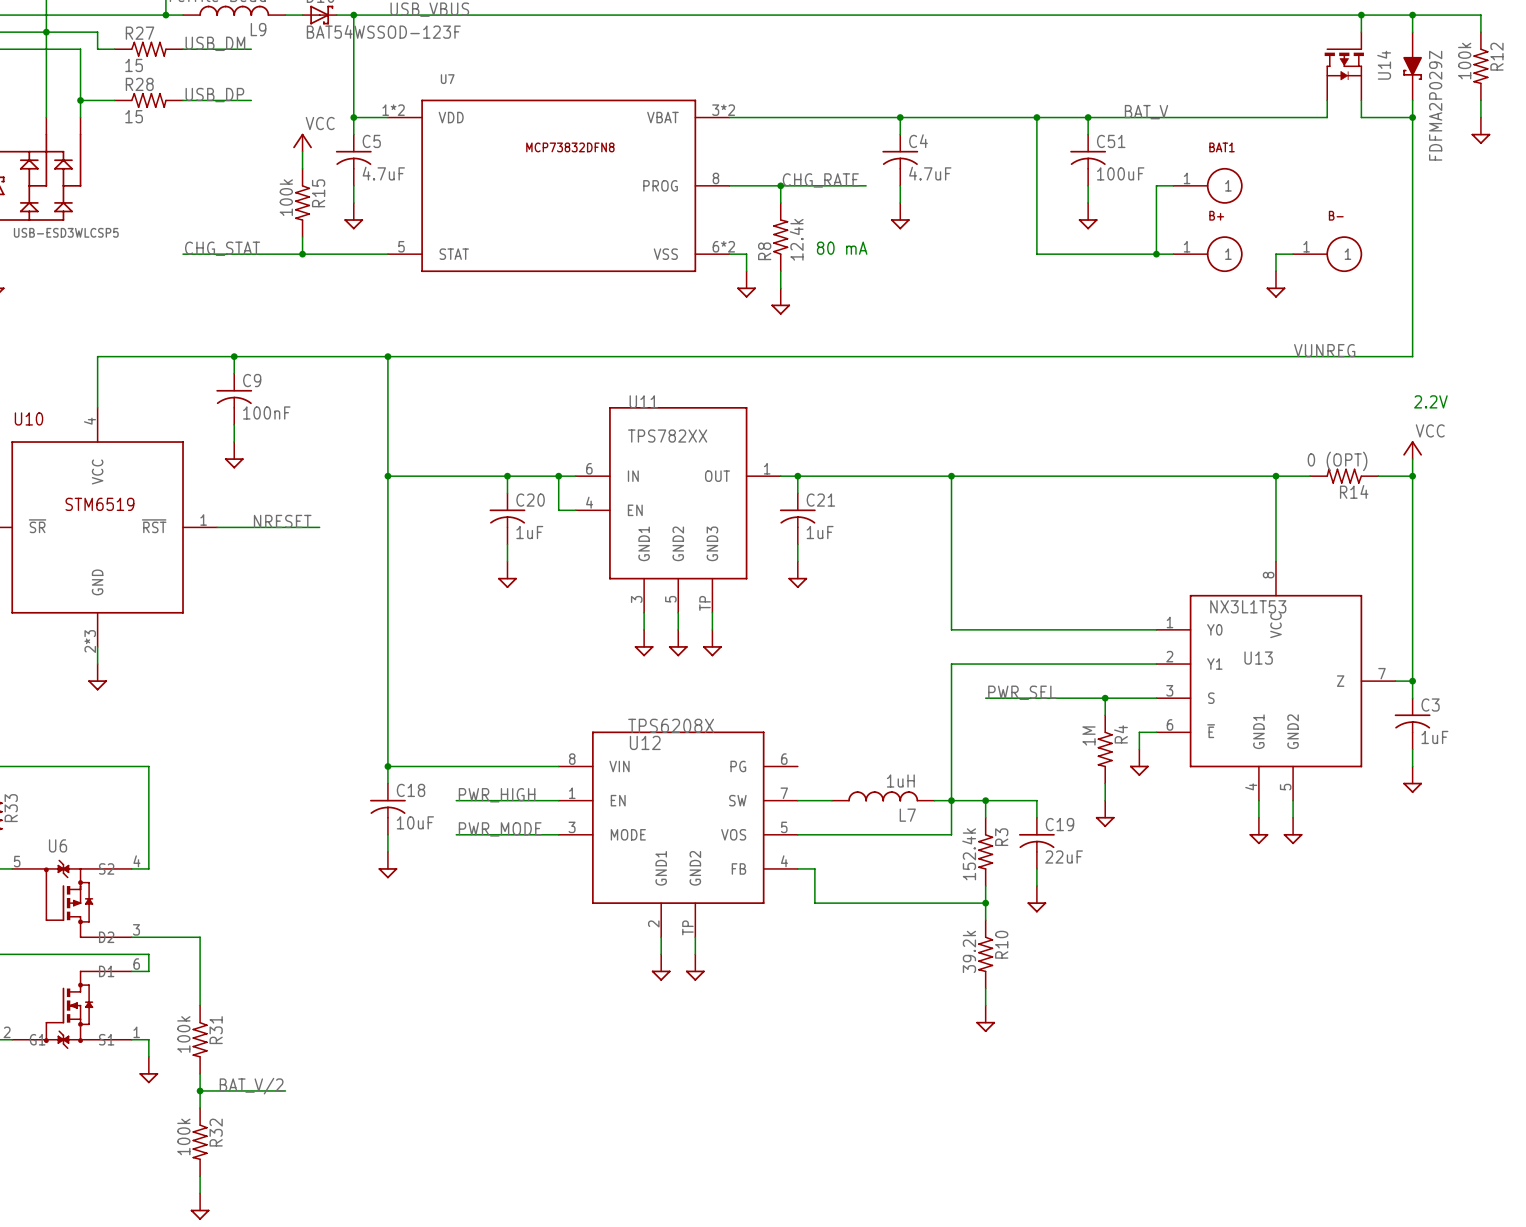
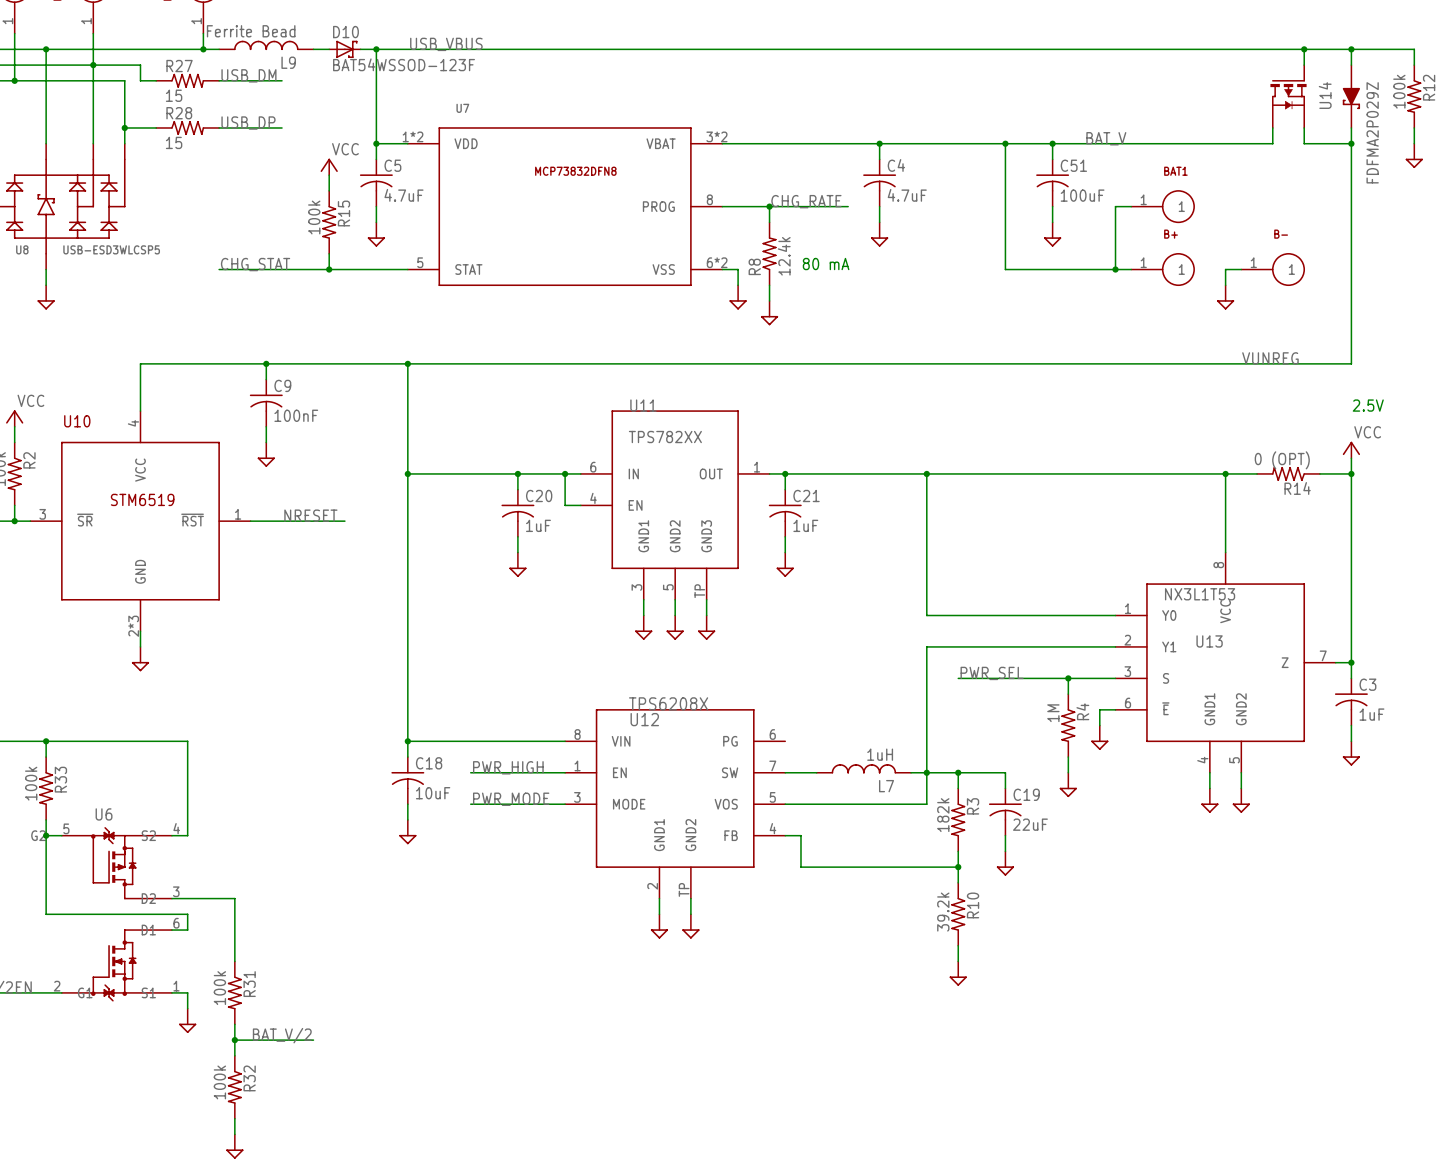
text: 2.2V (1430, 401) -> 2.5V (1368, 405)
R3 value: 152.4k (969, 854) -> 182k (943, 815)

